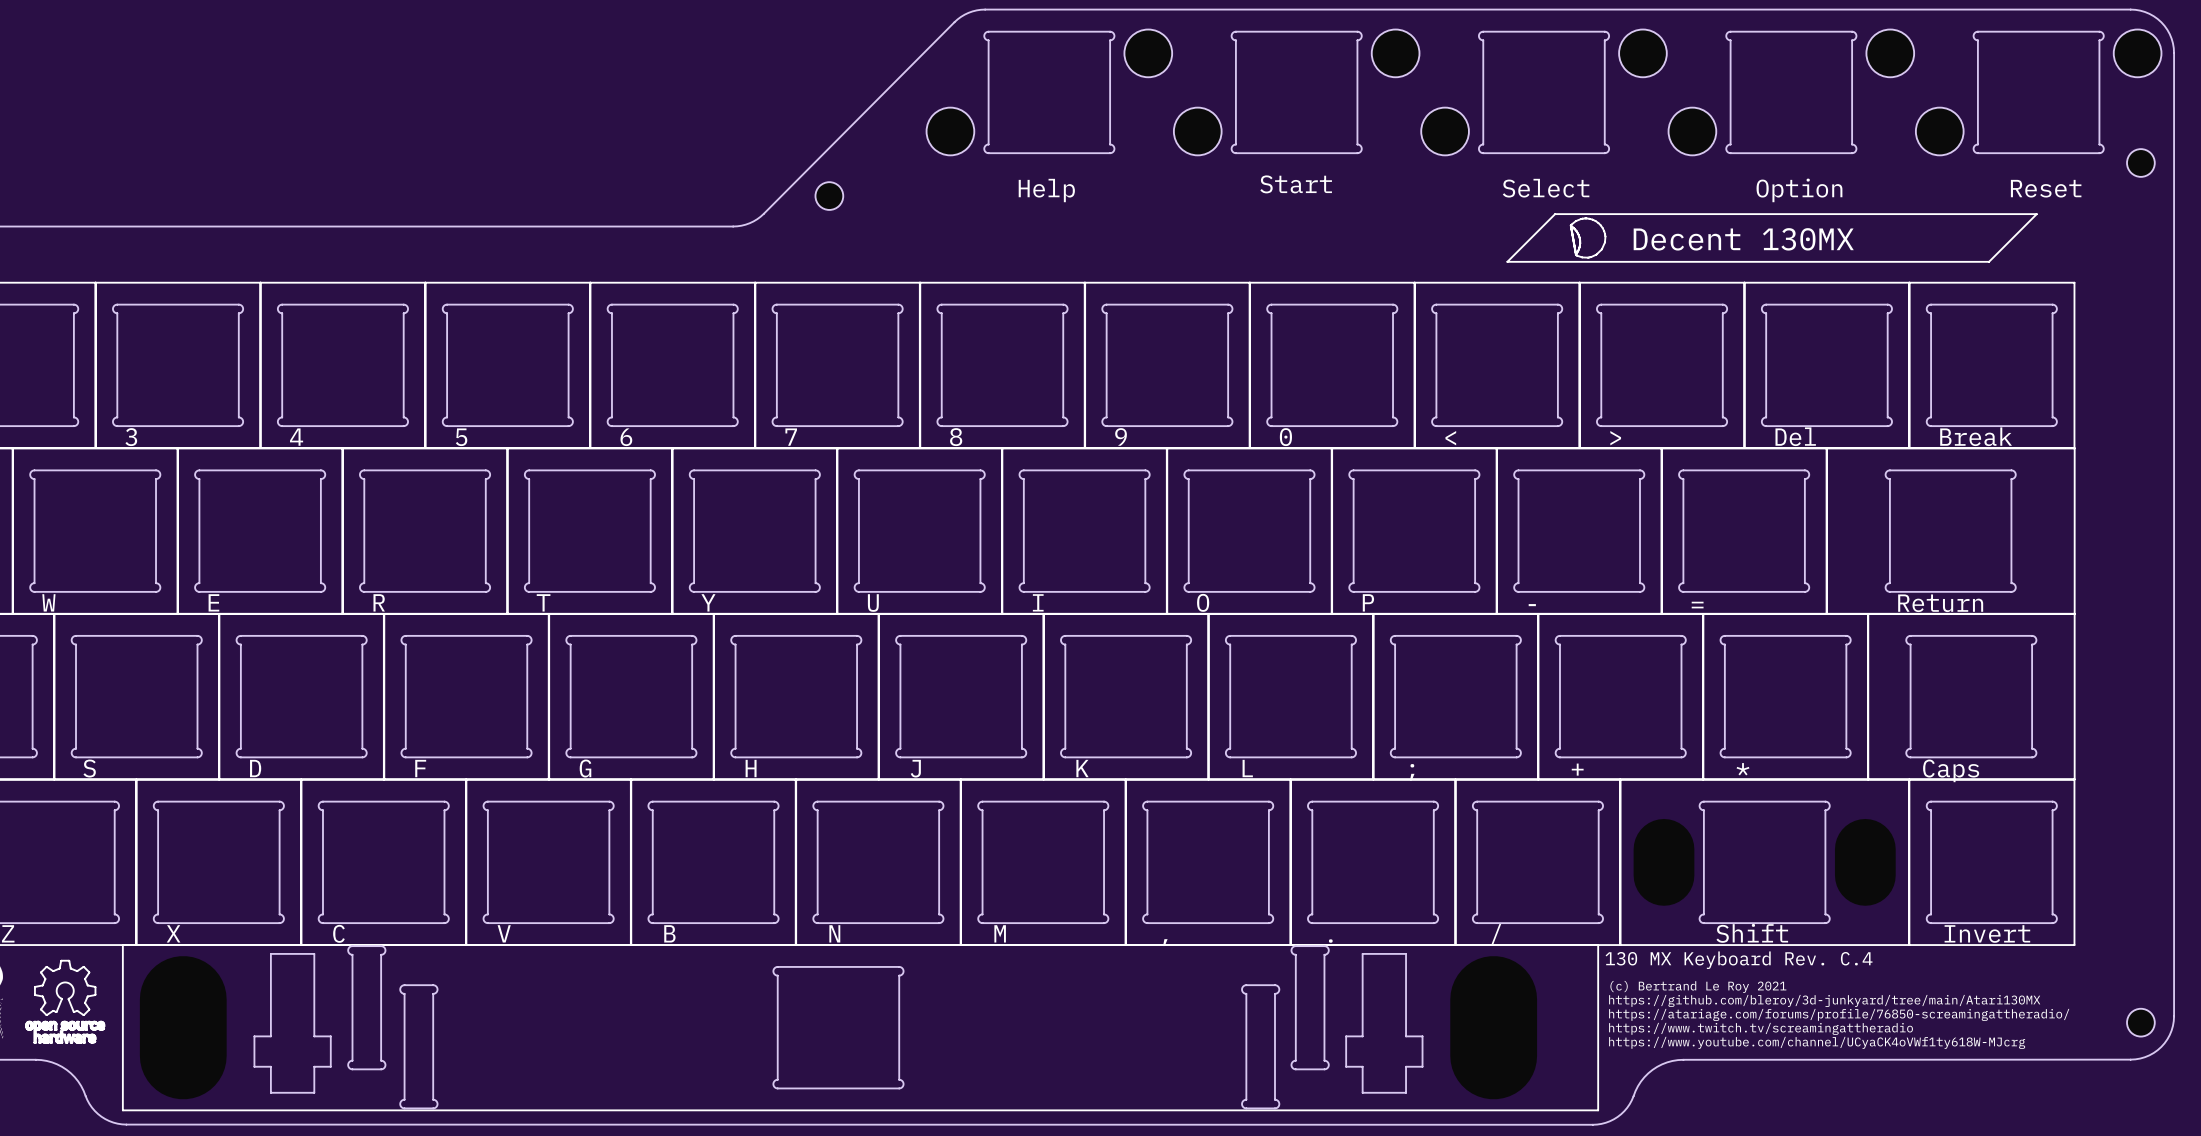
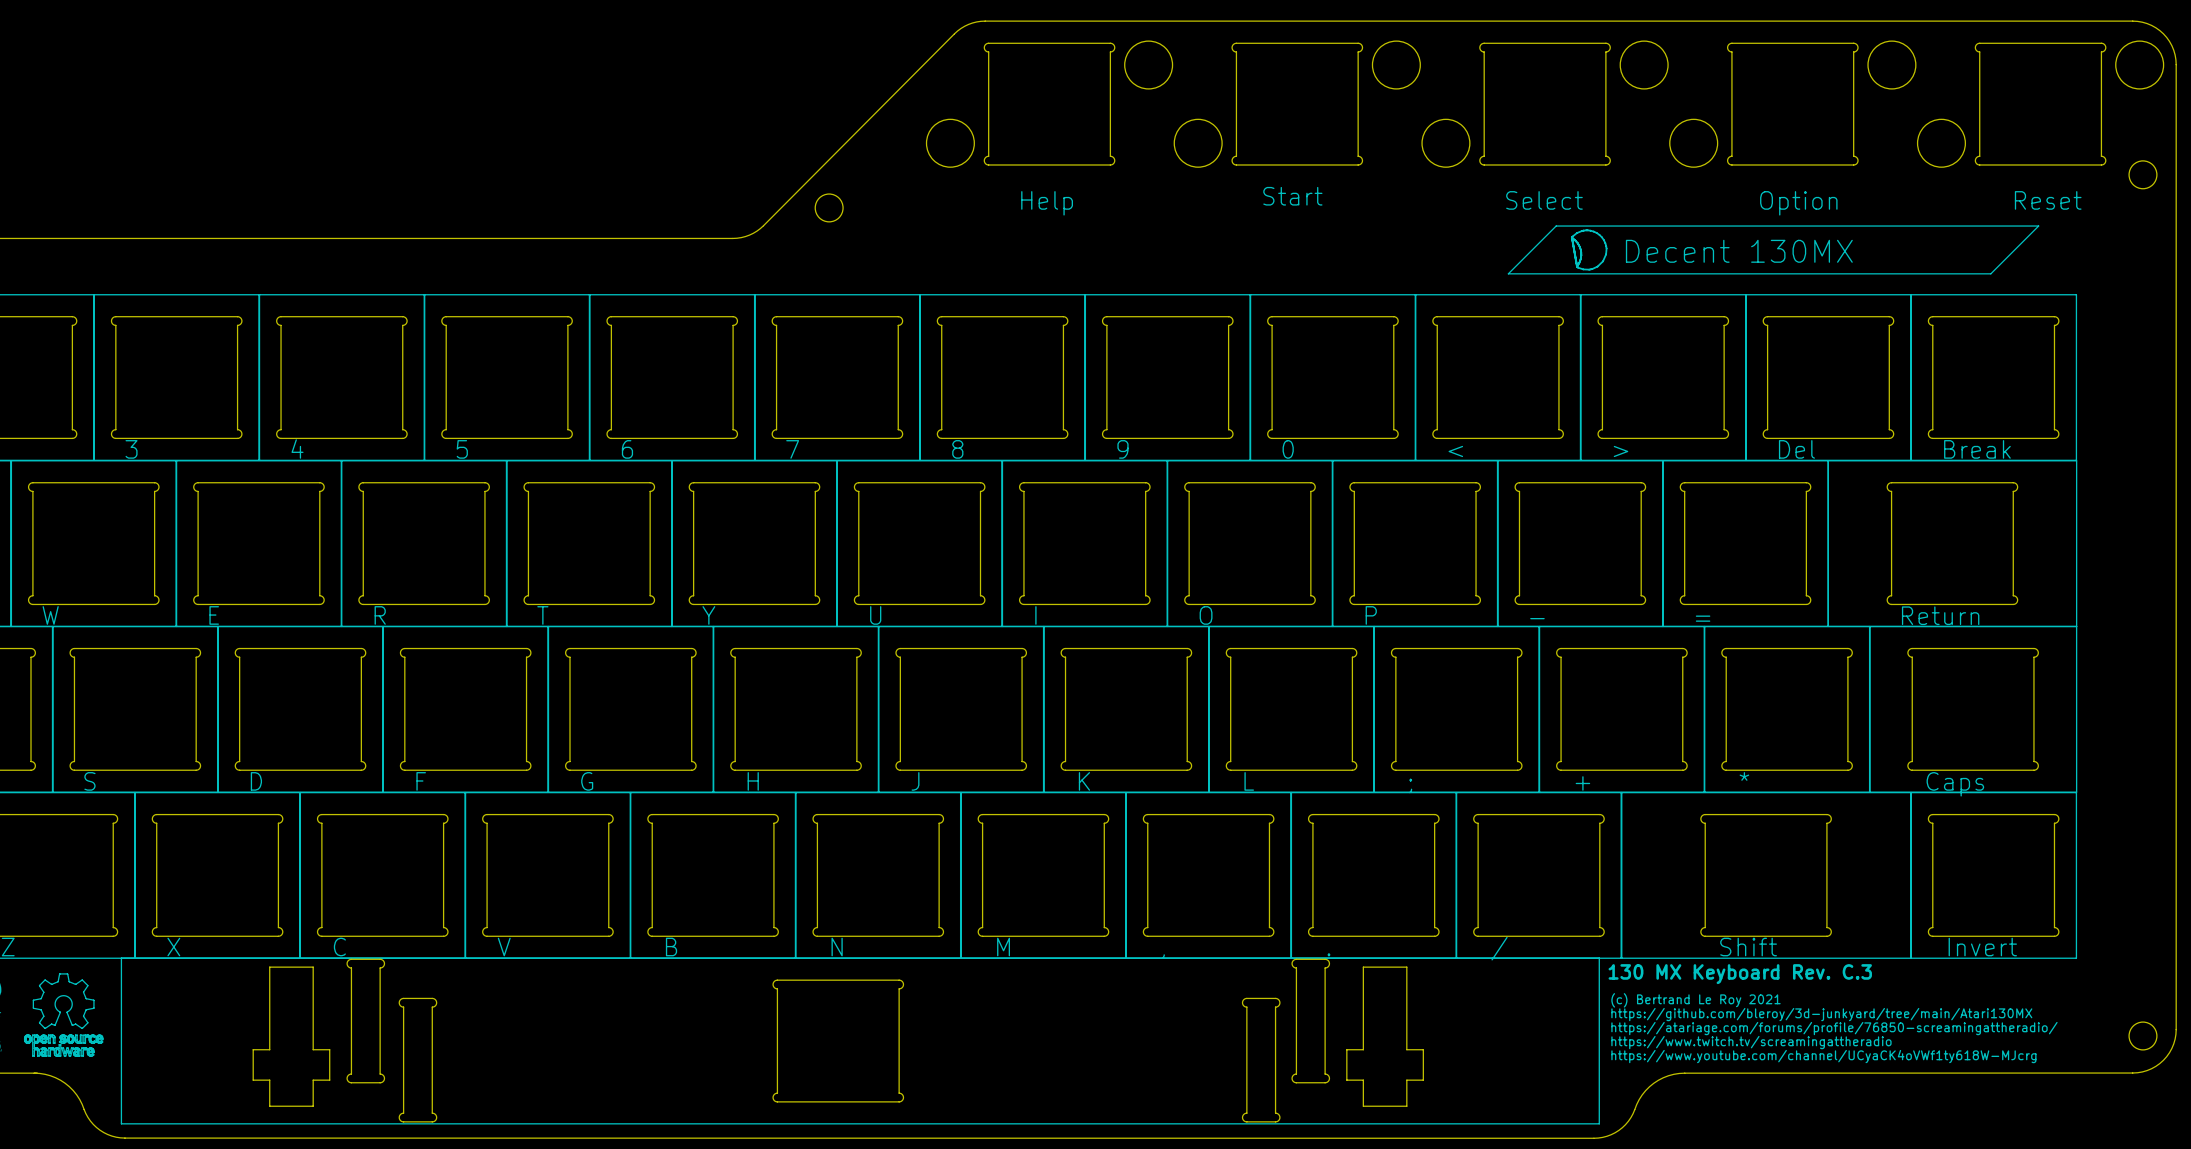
text: 130 MX Keyboard Rev. C.4 (1739, 960) -> 130 MX Keyboard Rev. C.3 (1740, 974)

